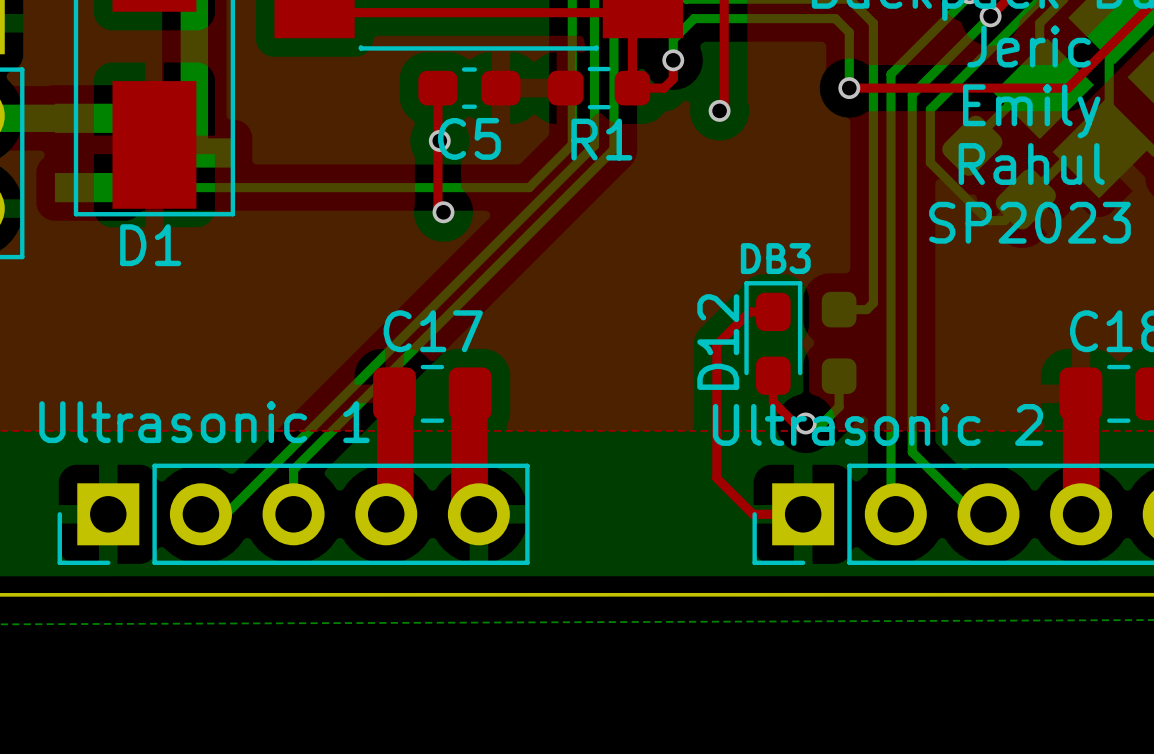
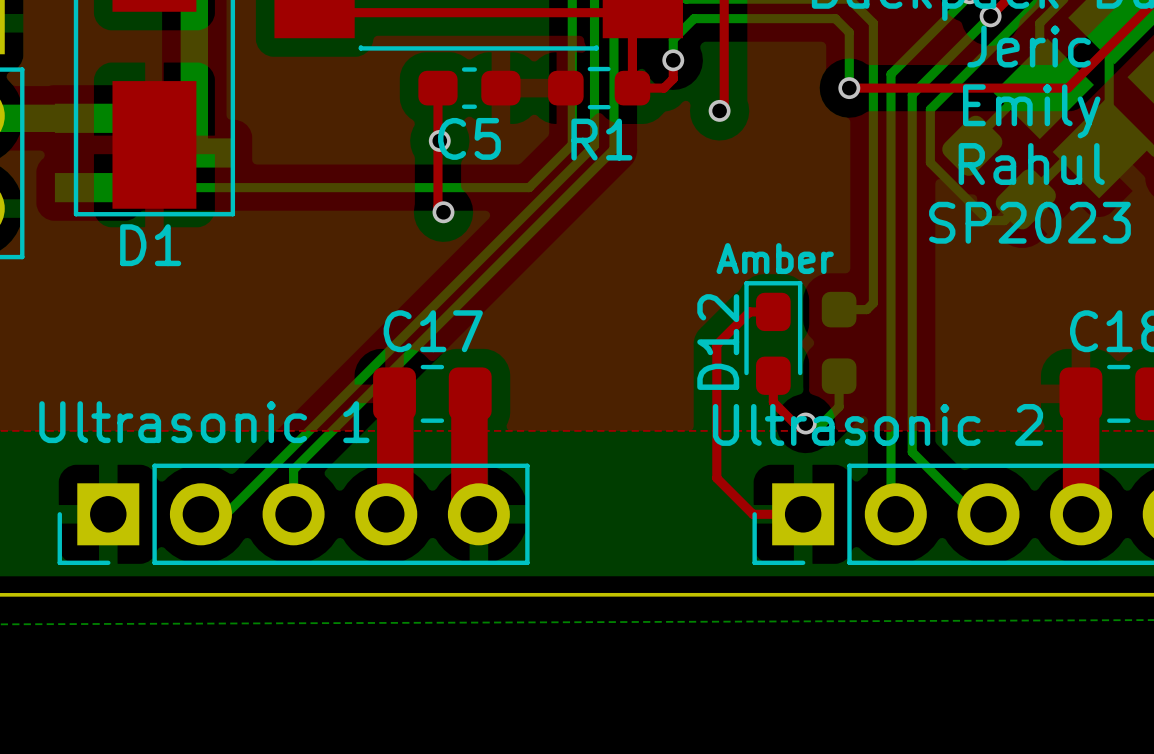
D12 value: DB3 (775, 258) -> Amber (775, 258)

